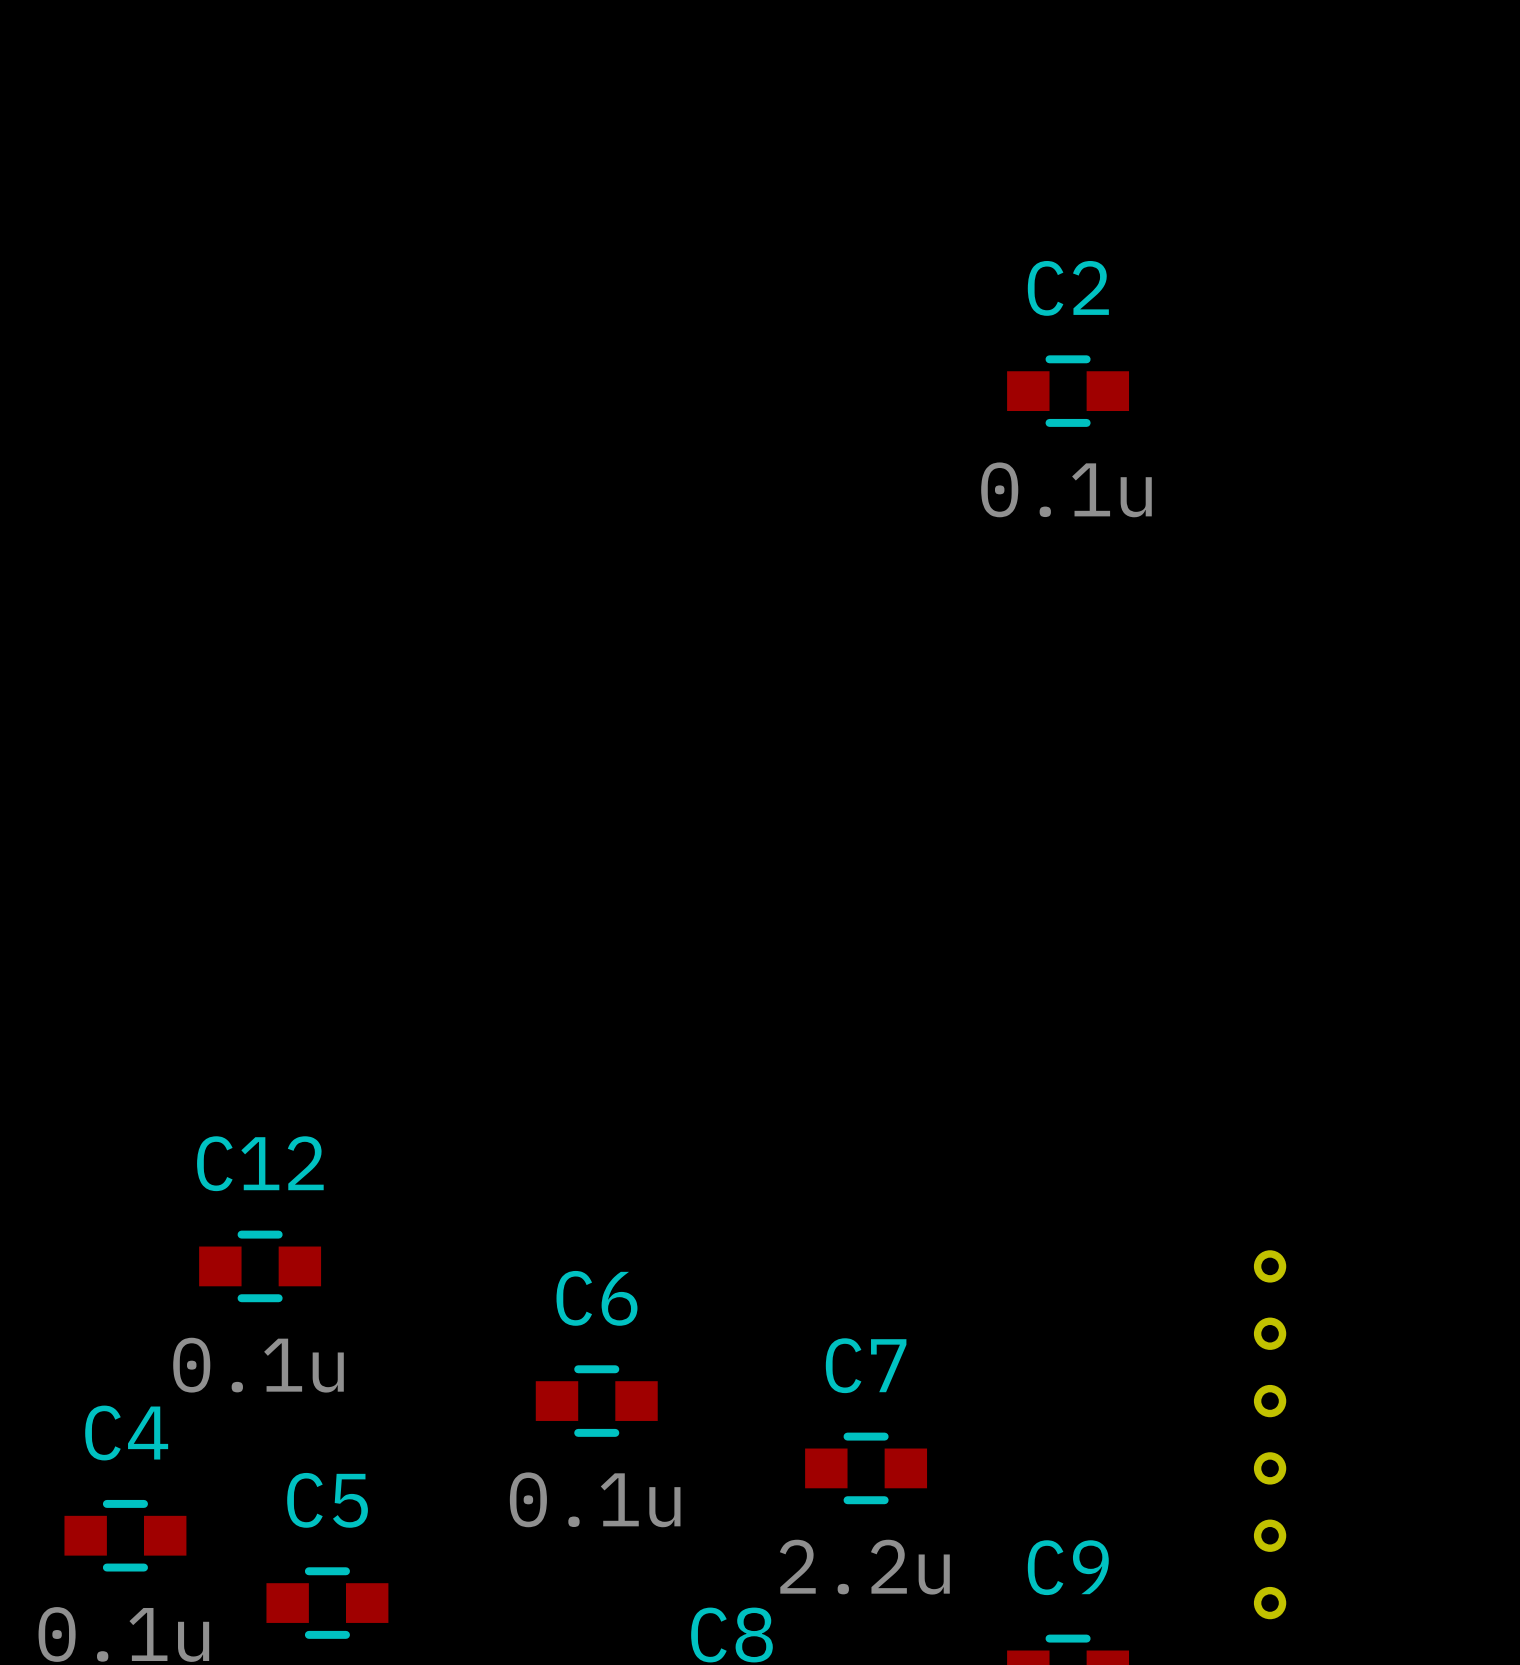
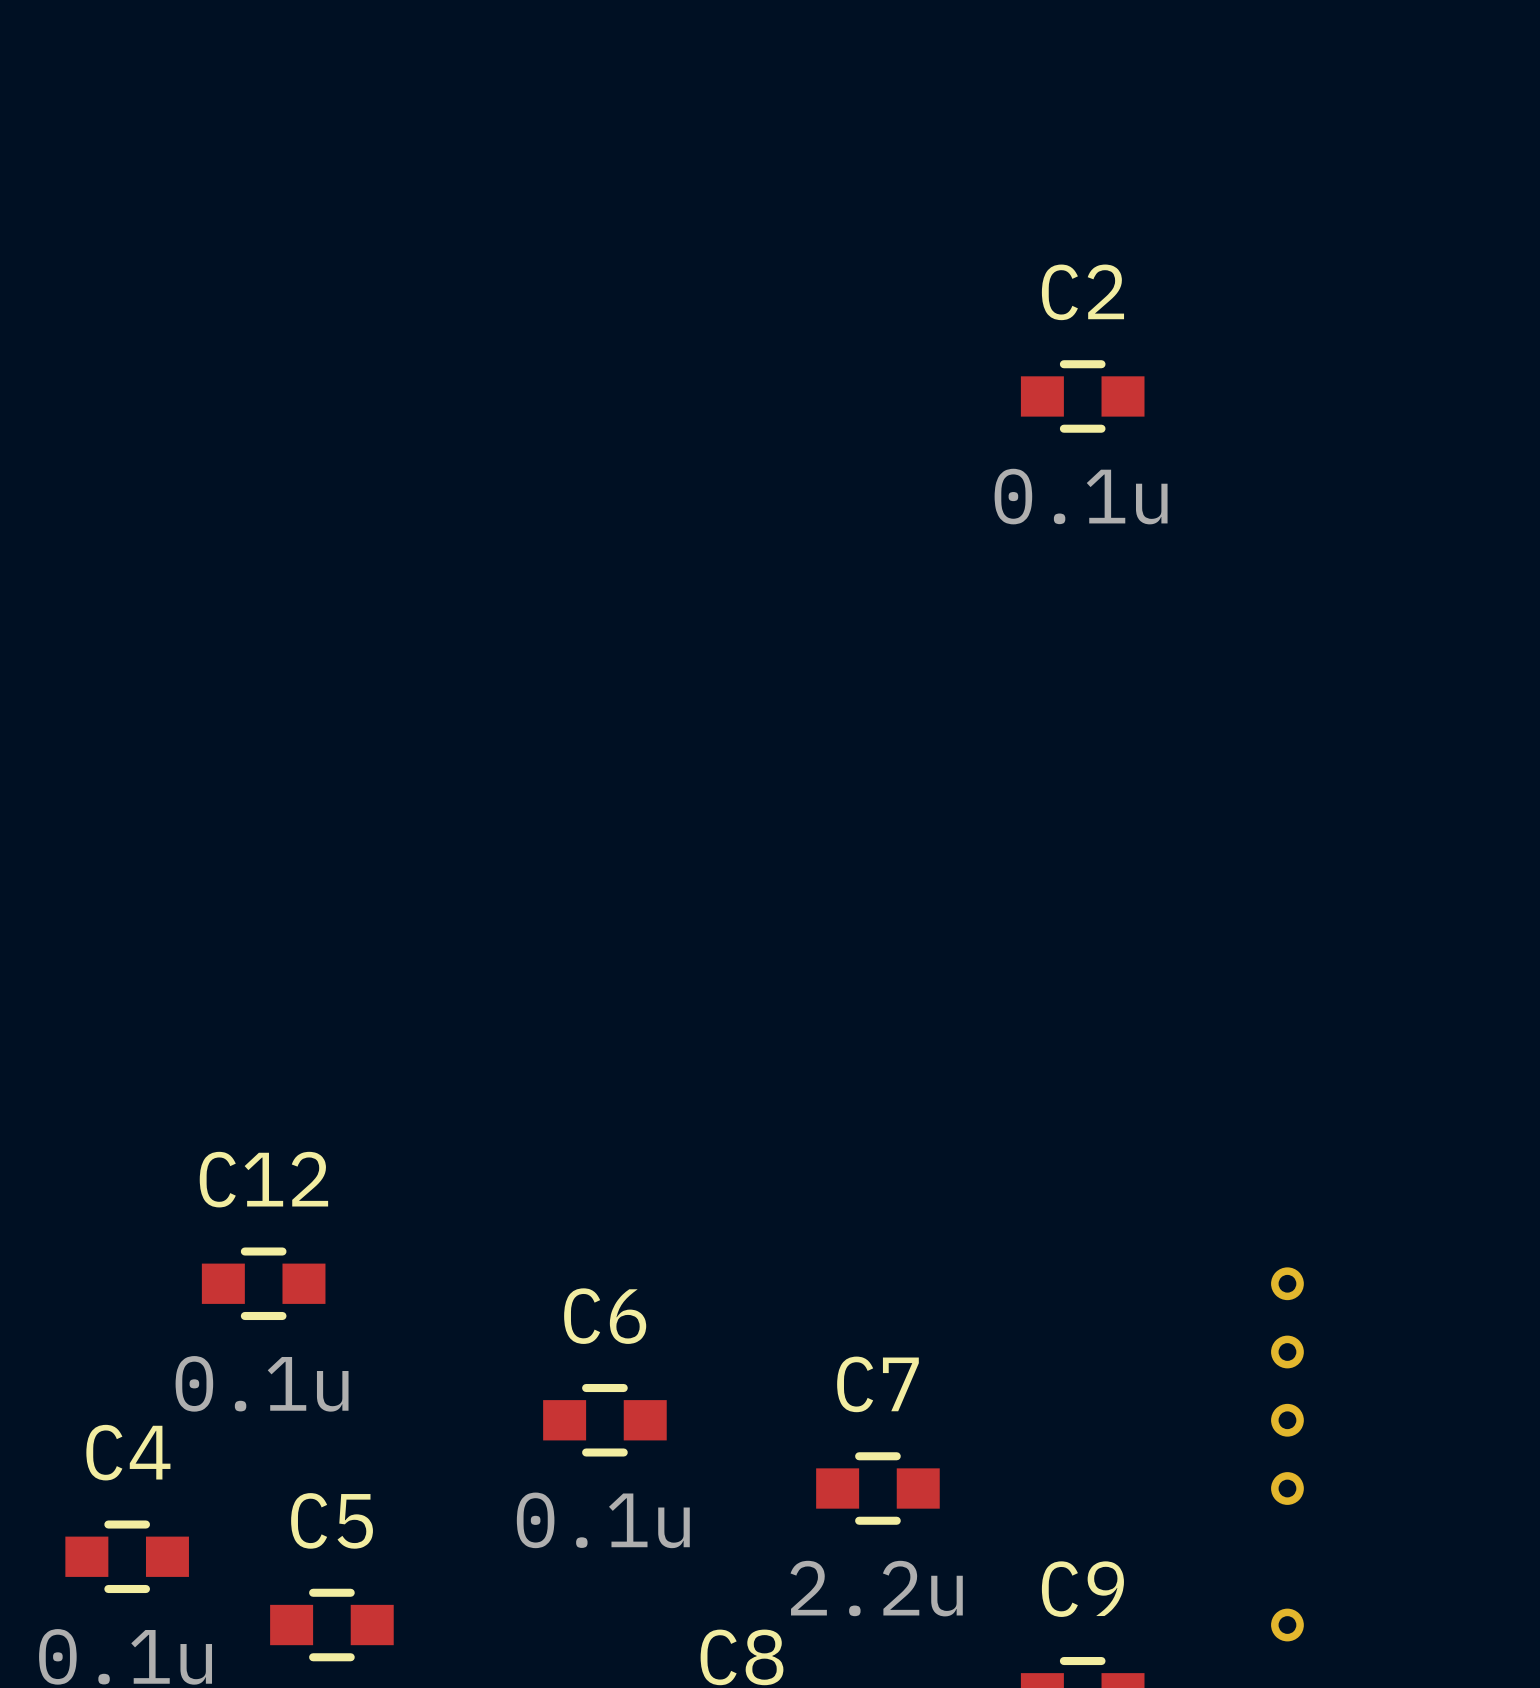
part: (1270, 1535) -> none

